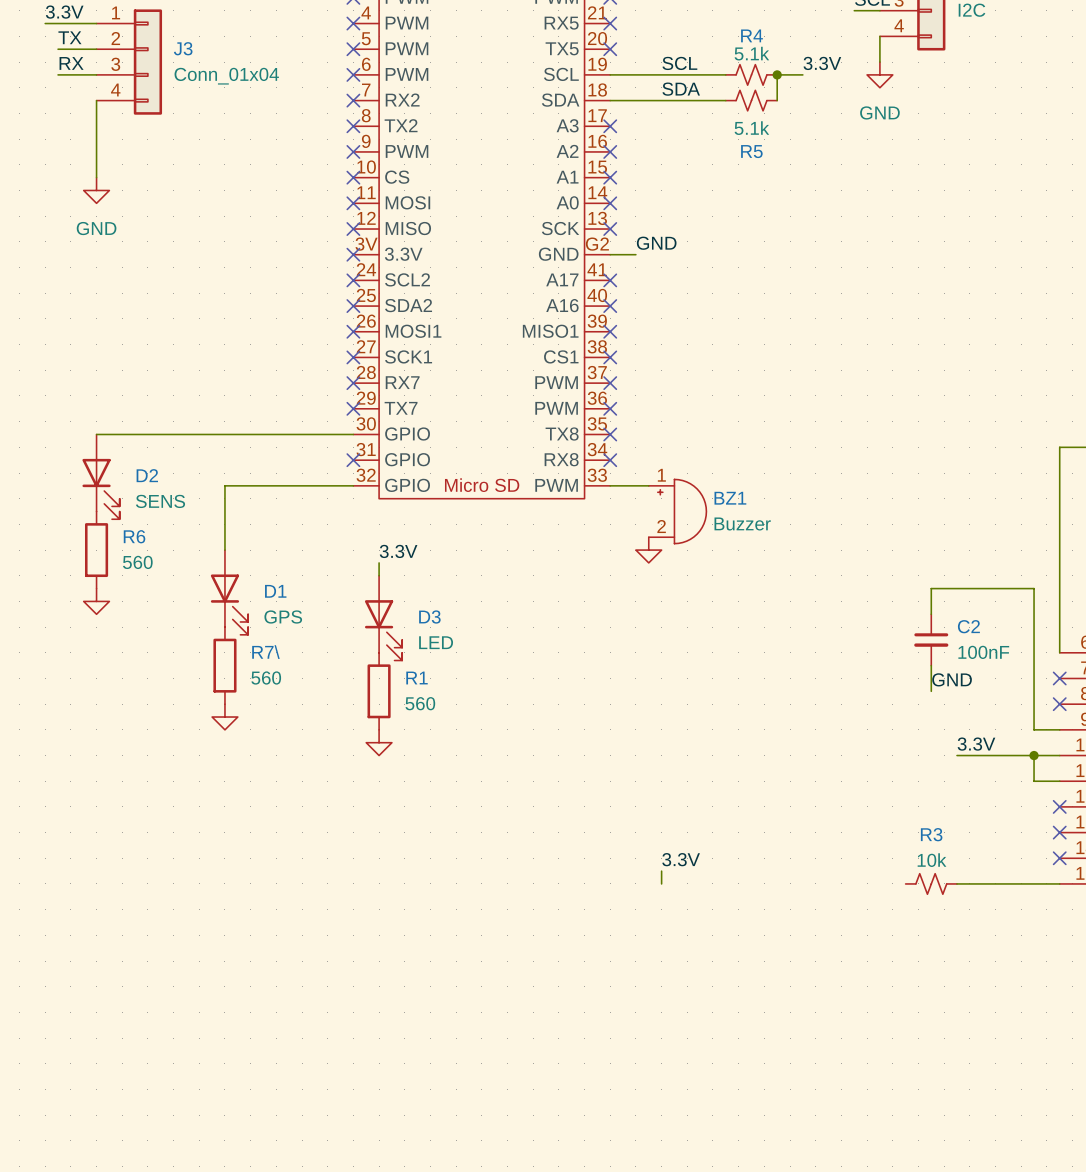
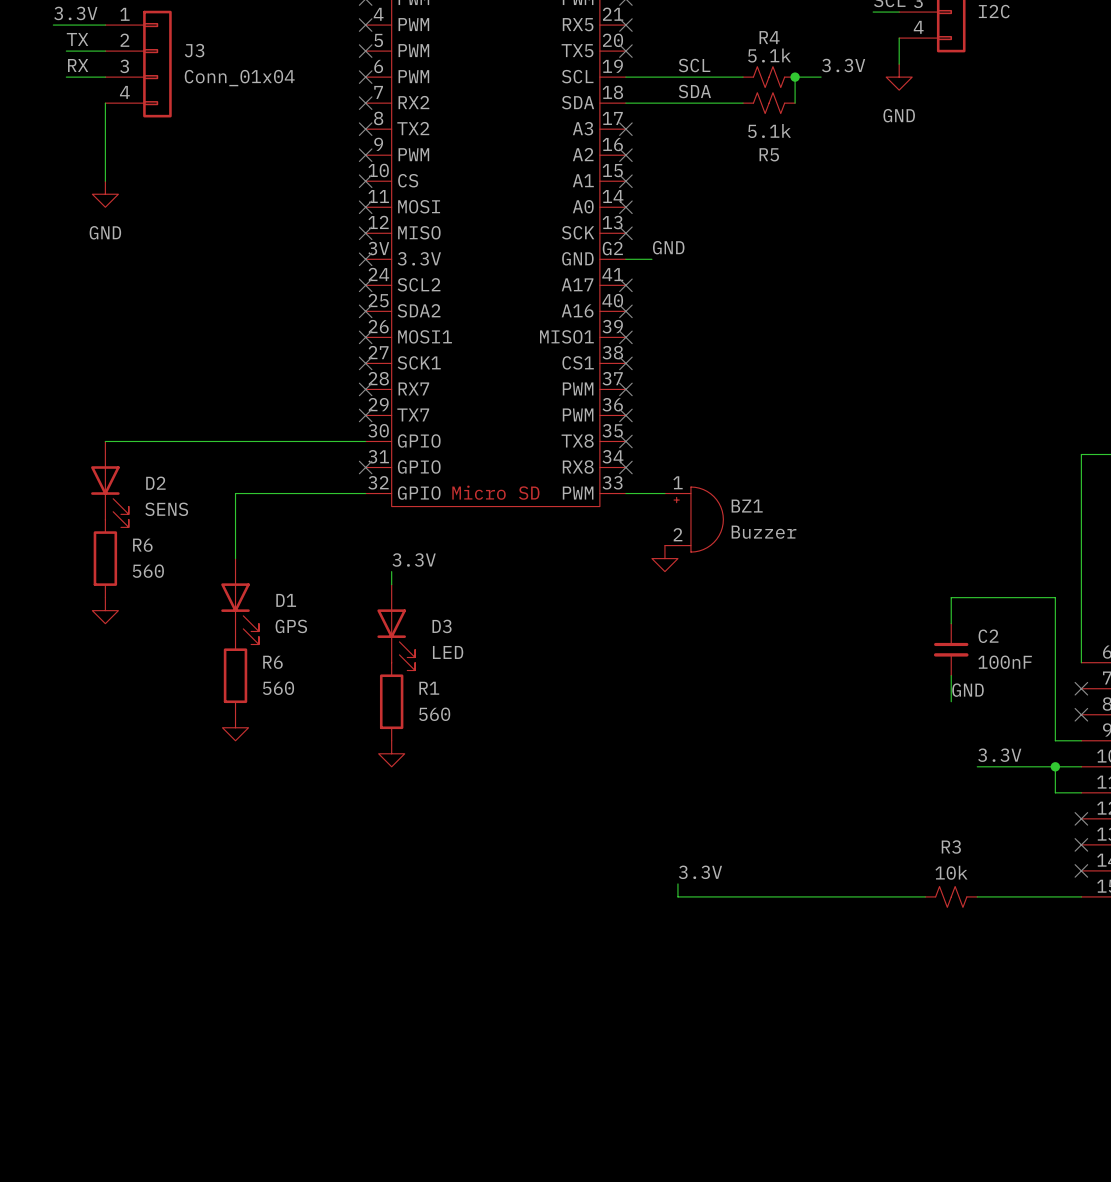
R7\ name: R7\ (265, 652) -> R6 (272, 662)
wire: none -> (677, 896) (925, 896)

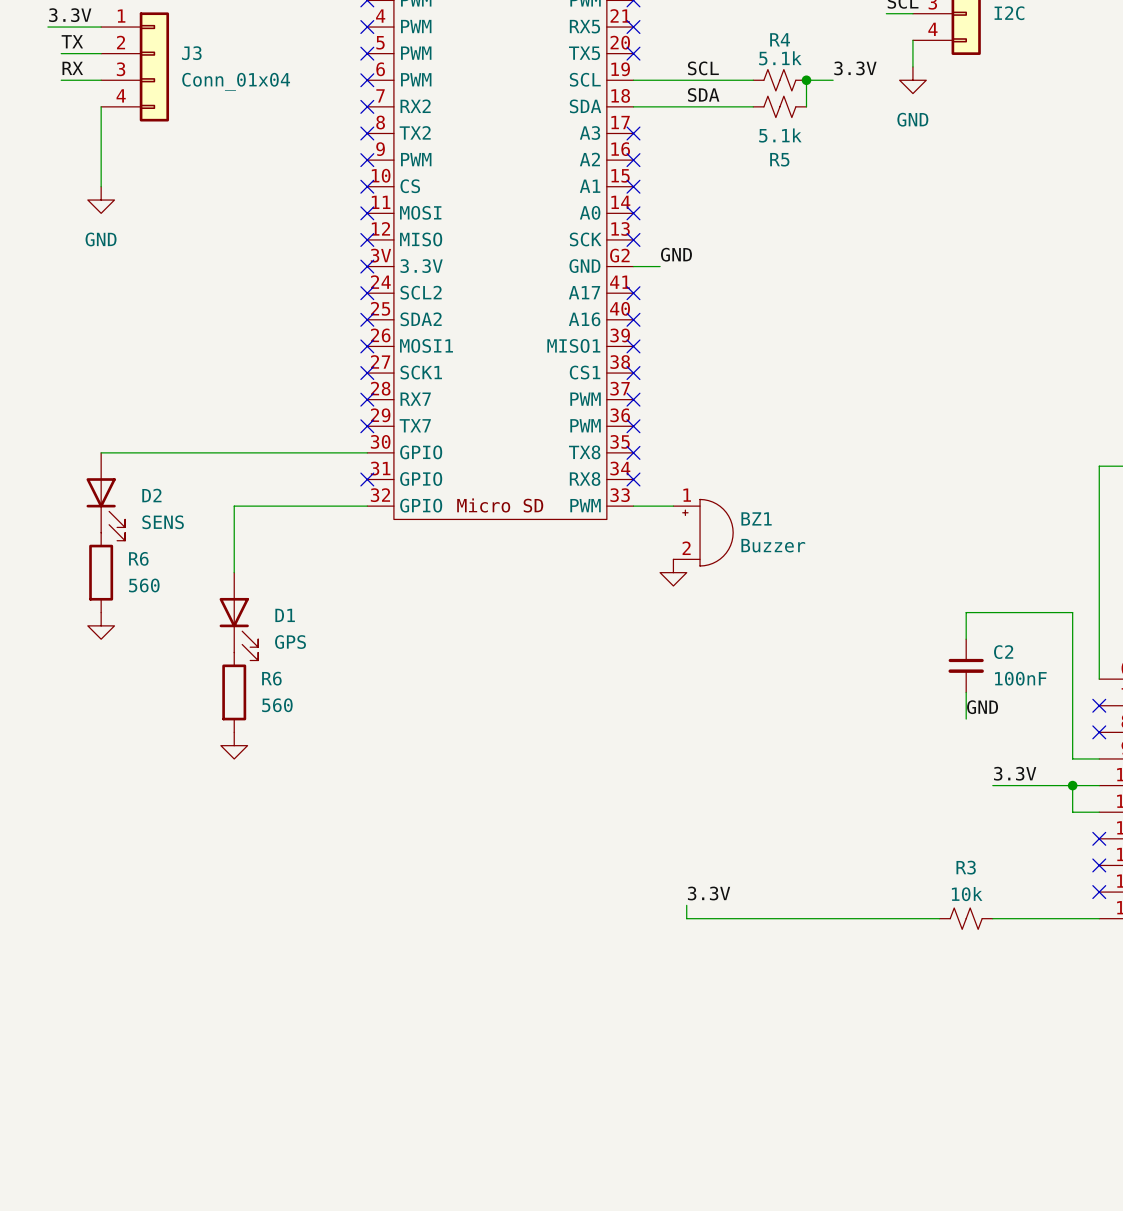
label: 3.3V (414, 560) -> none
wire: (391, 571) (391, 584) -> none
D3: LED (396, 627) -> none
R1: 560 (391, 701) -> none
power symbol: (391, 753) -> none

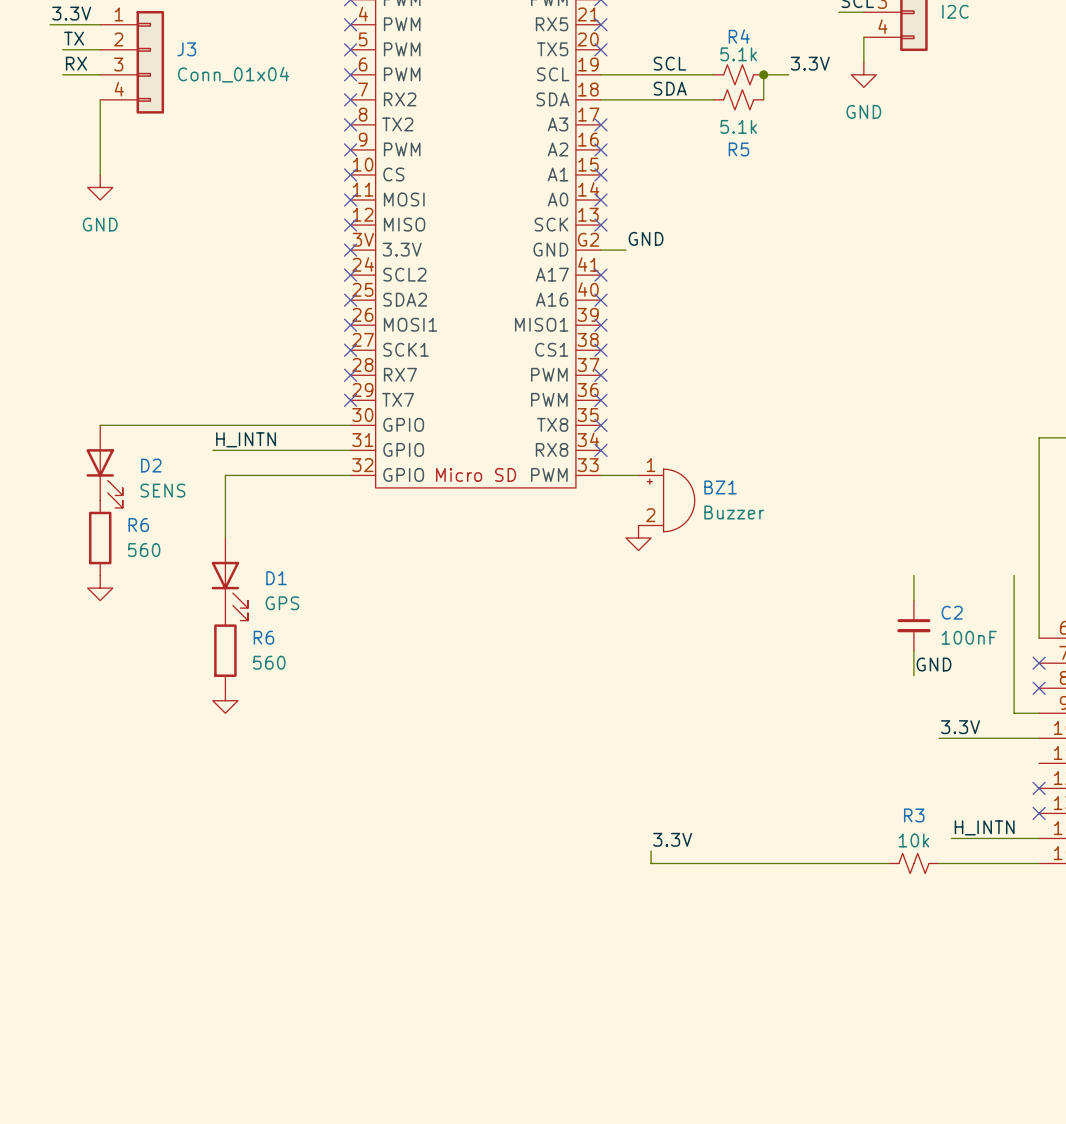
label: none -> H_INTN (246, 439)
wire: none -> (212, 450) (350, 450)
no-connect mark: (367, 479) -> none
wire: (966, 612) (1072, 612) -> none
wire: (1072, 785) (1072, 812) (1099, 812) -> none
junction: (1072, 785) -> none
label: none -> H_INTN (984, 827)
wire: none -> (951, 838) (1039, 838)
no-connect mark: (1099, 892) -> none

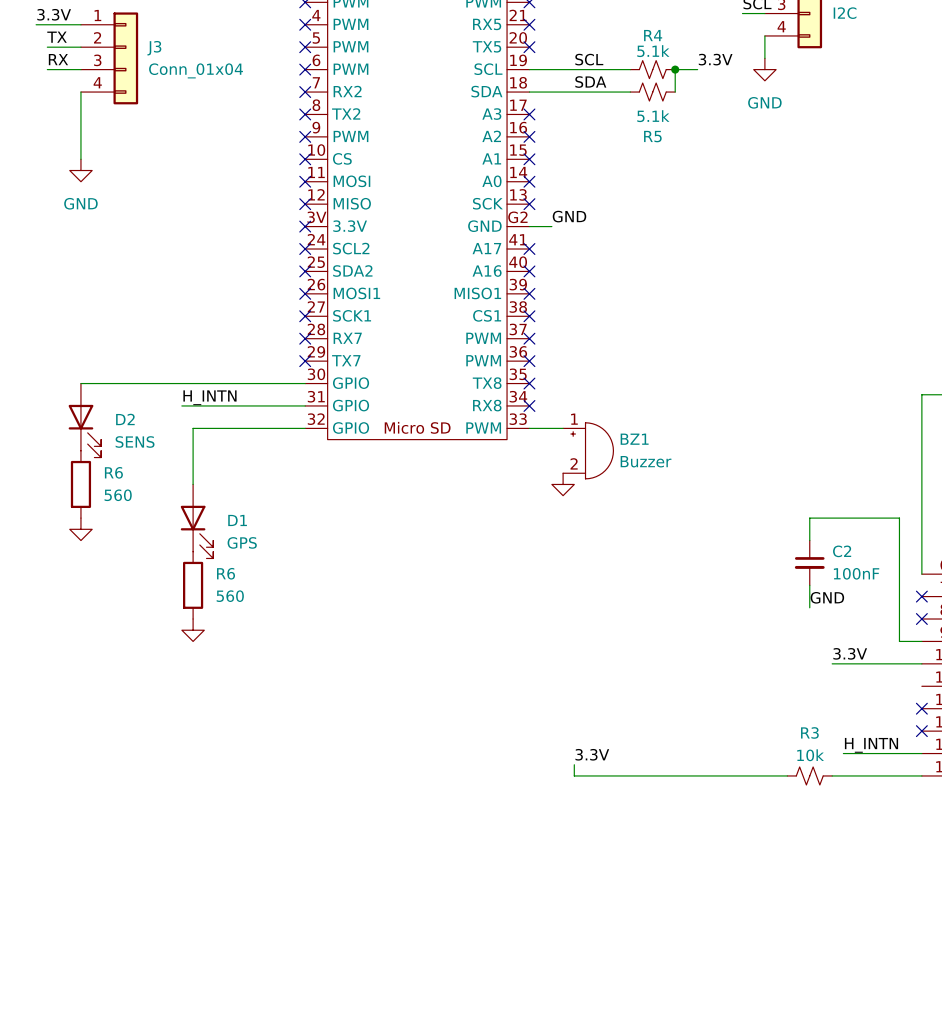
wire: none -> (809, 518) (899, 518)

